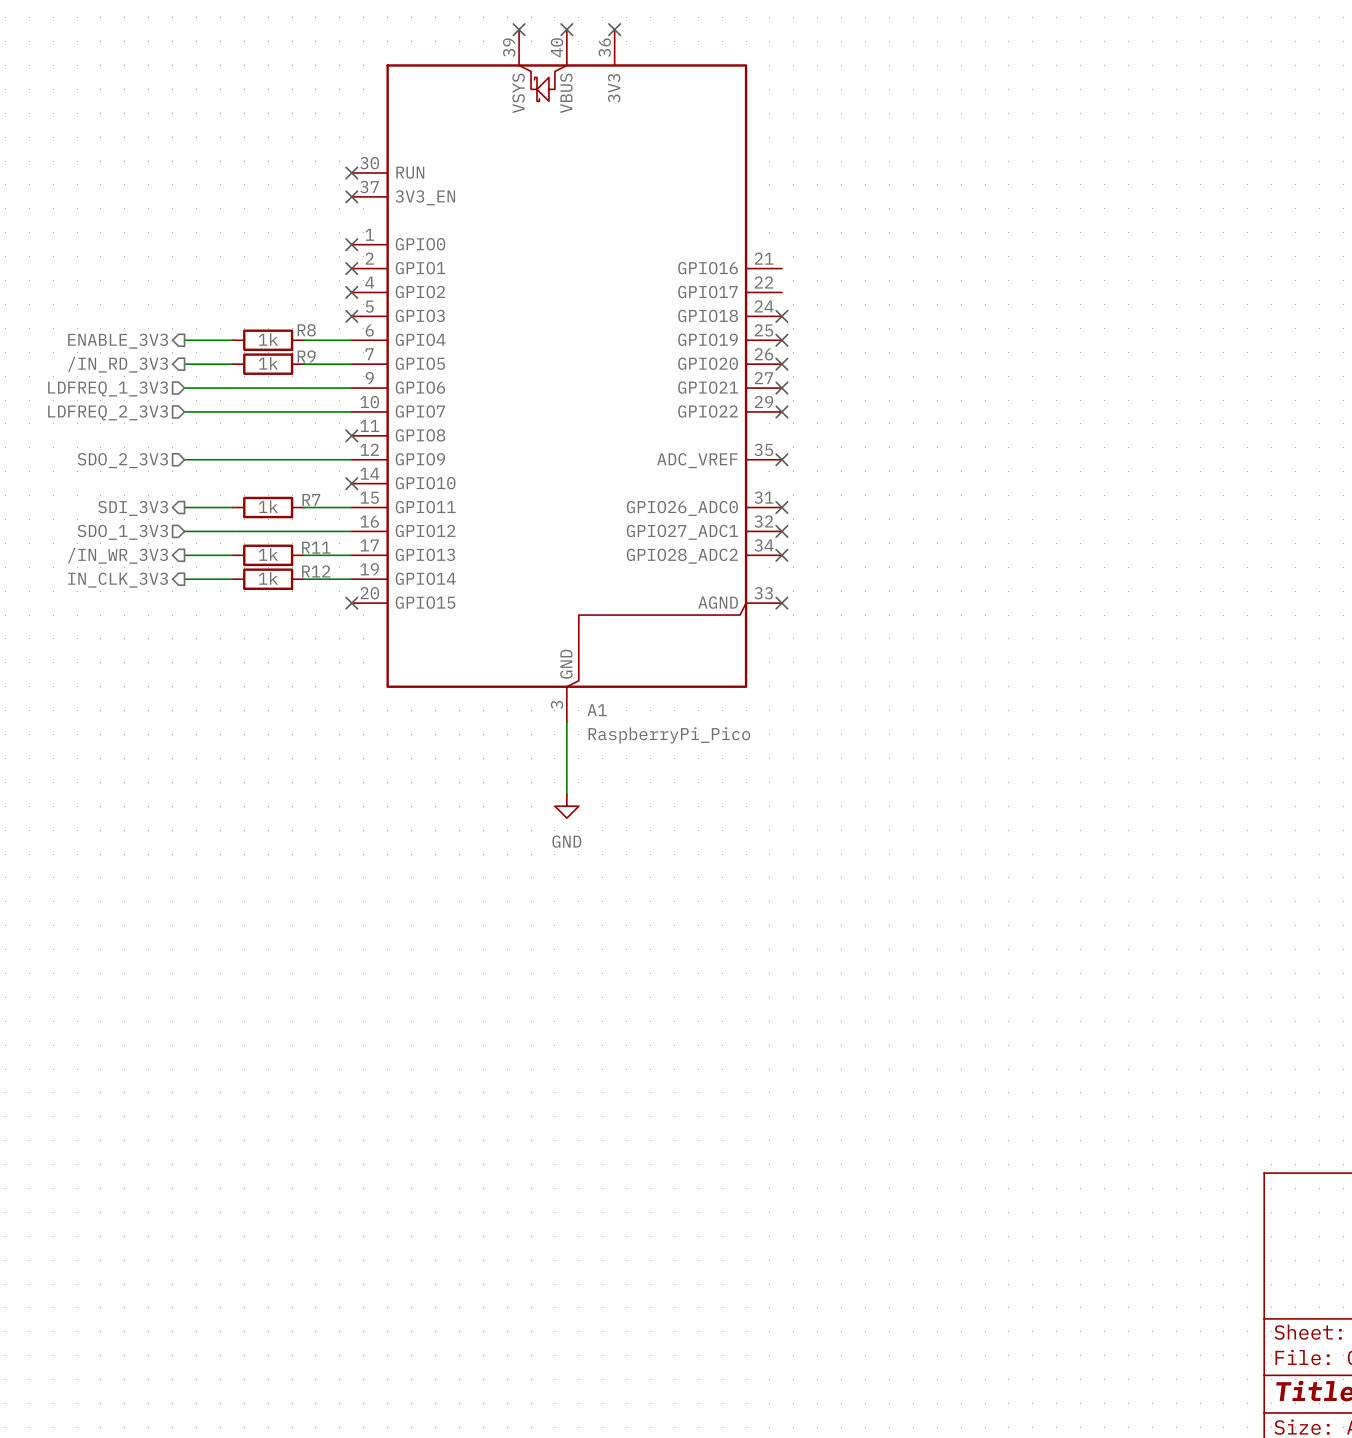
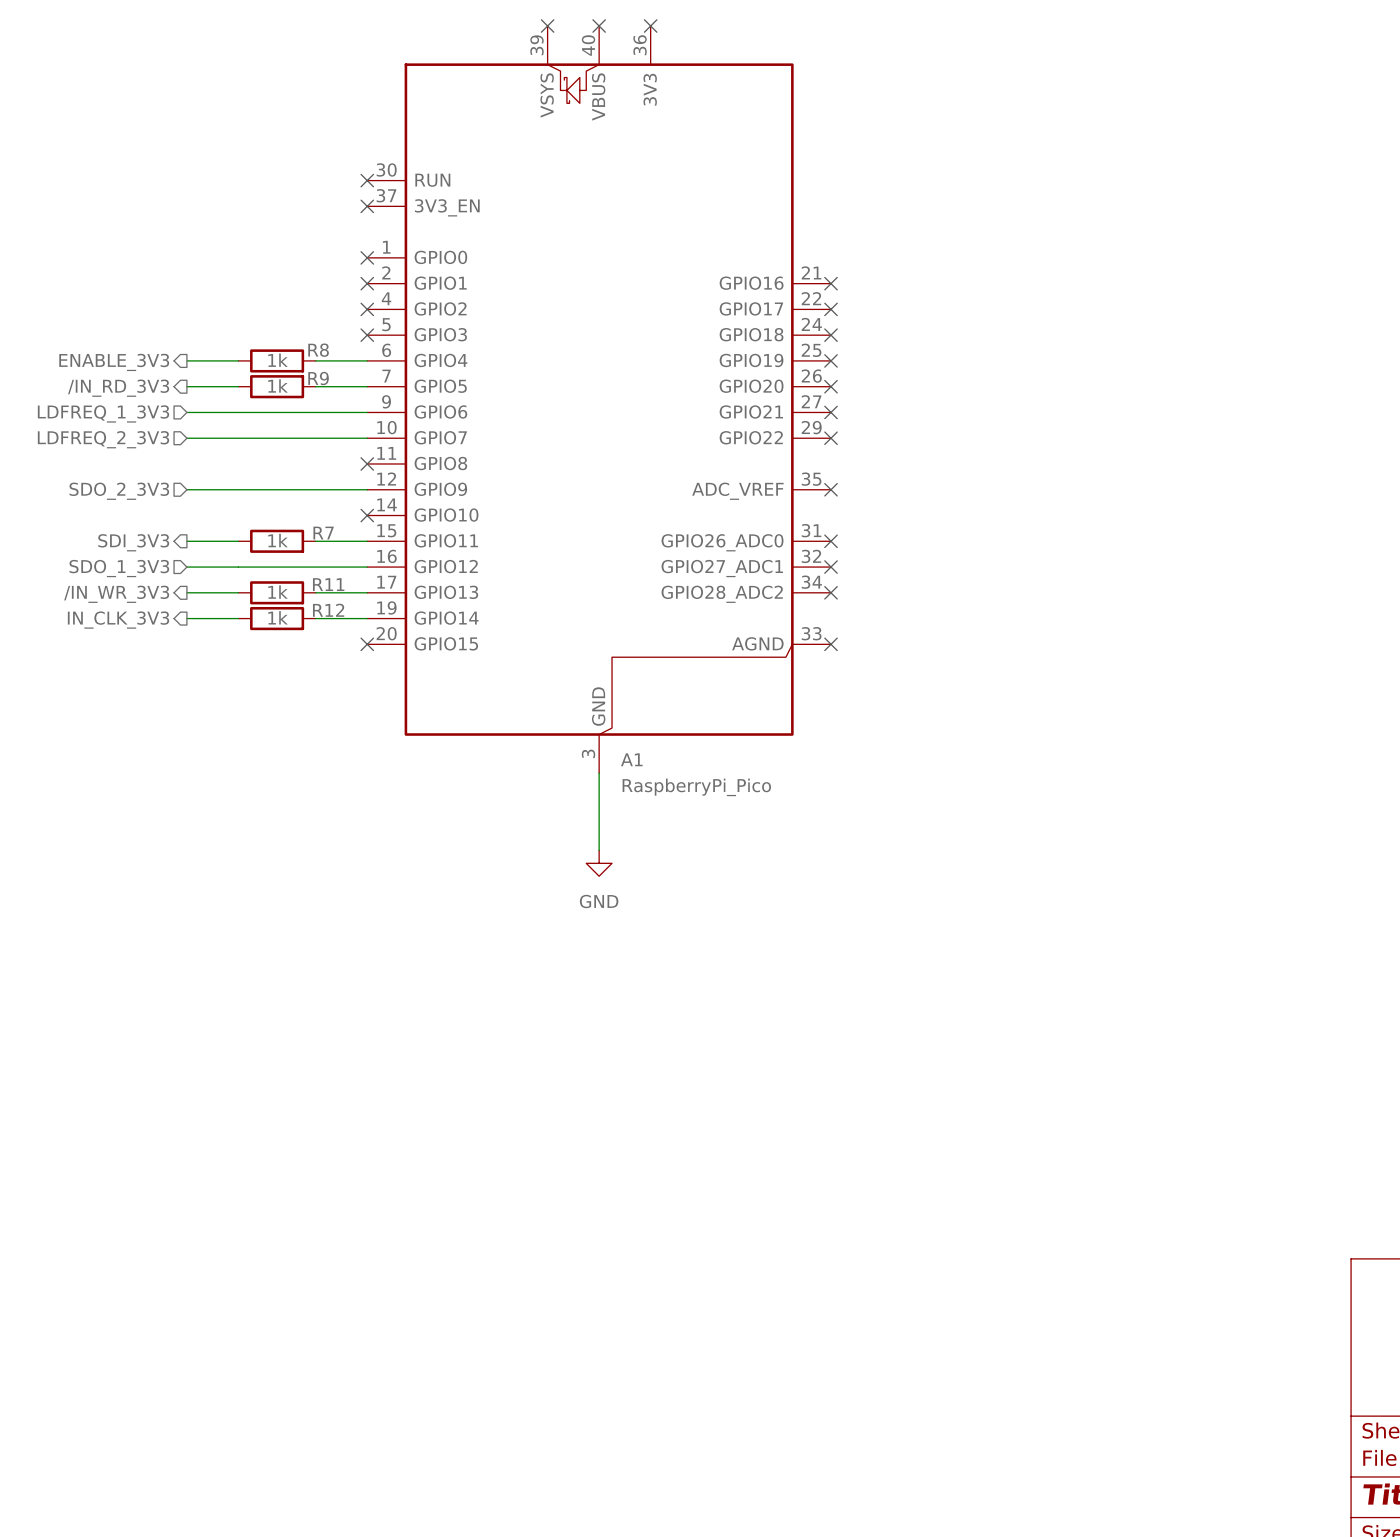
no-connect mark: none -> (831, 283)
no-connect mark: none -> (831, 309)

